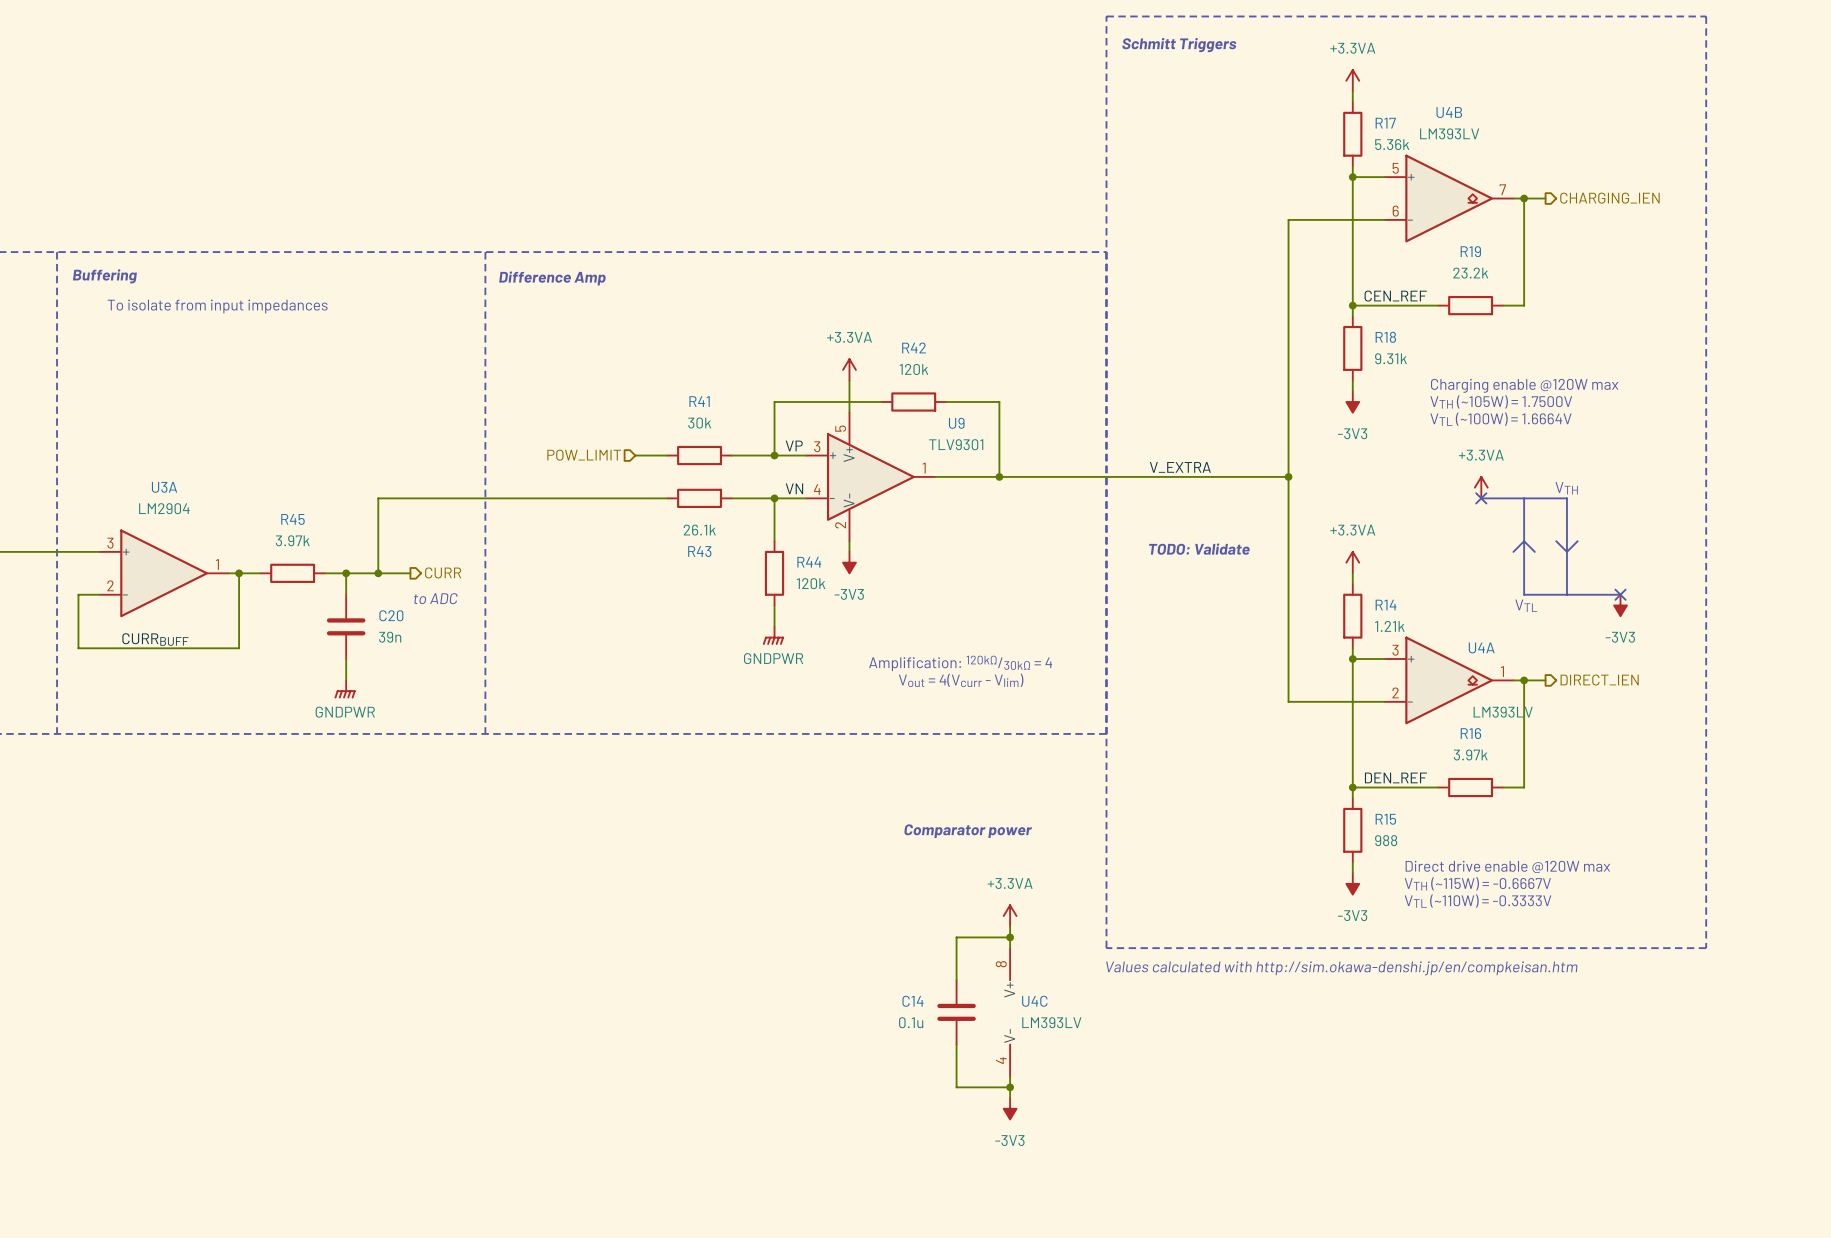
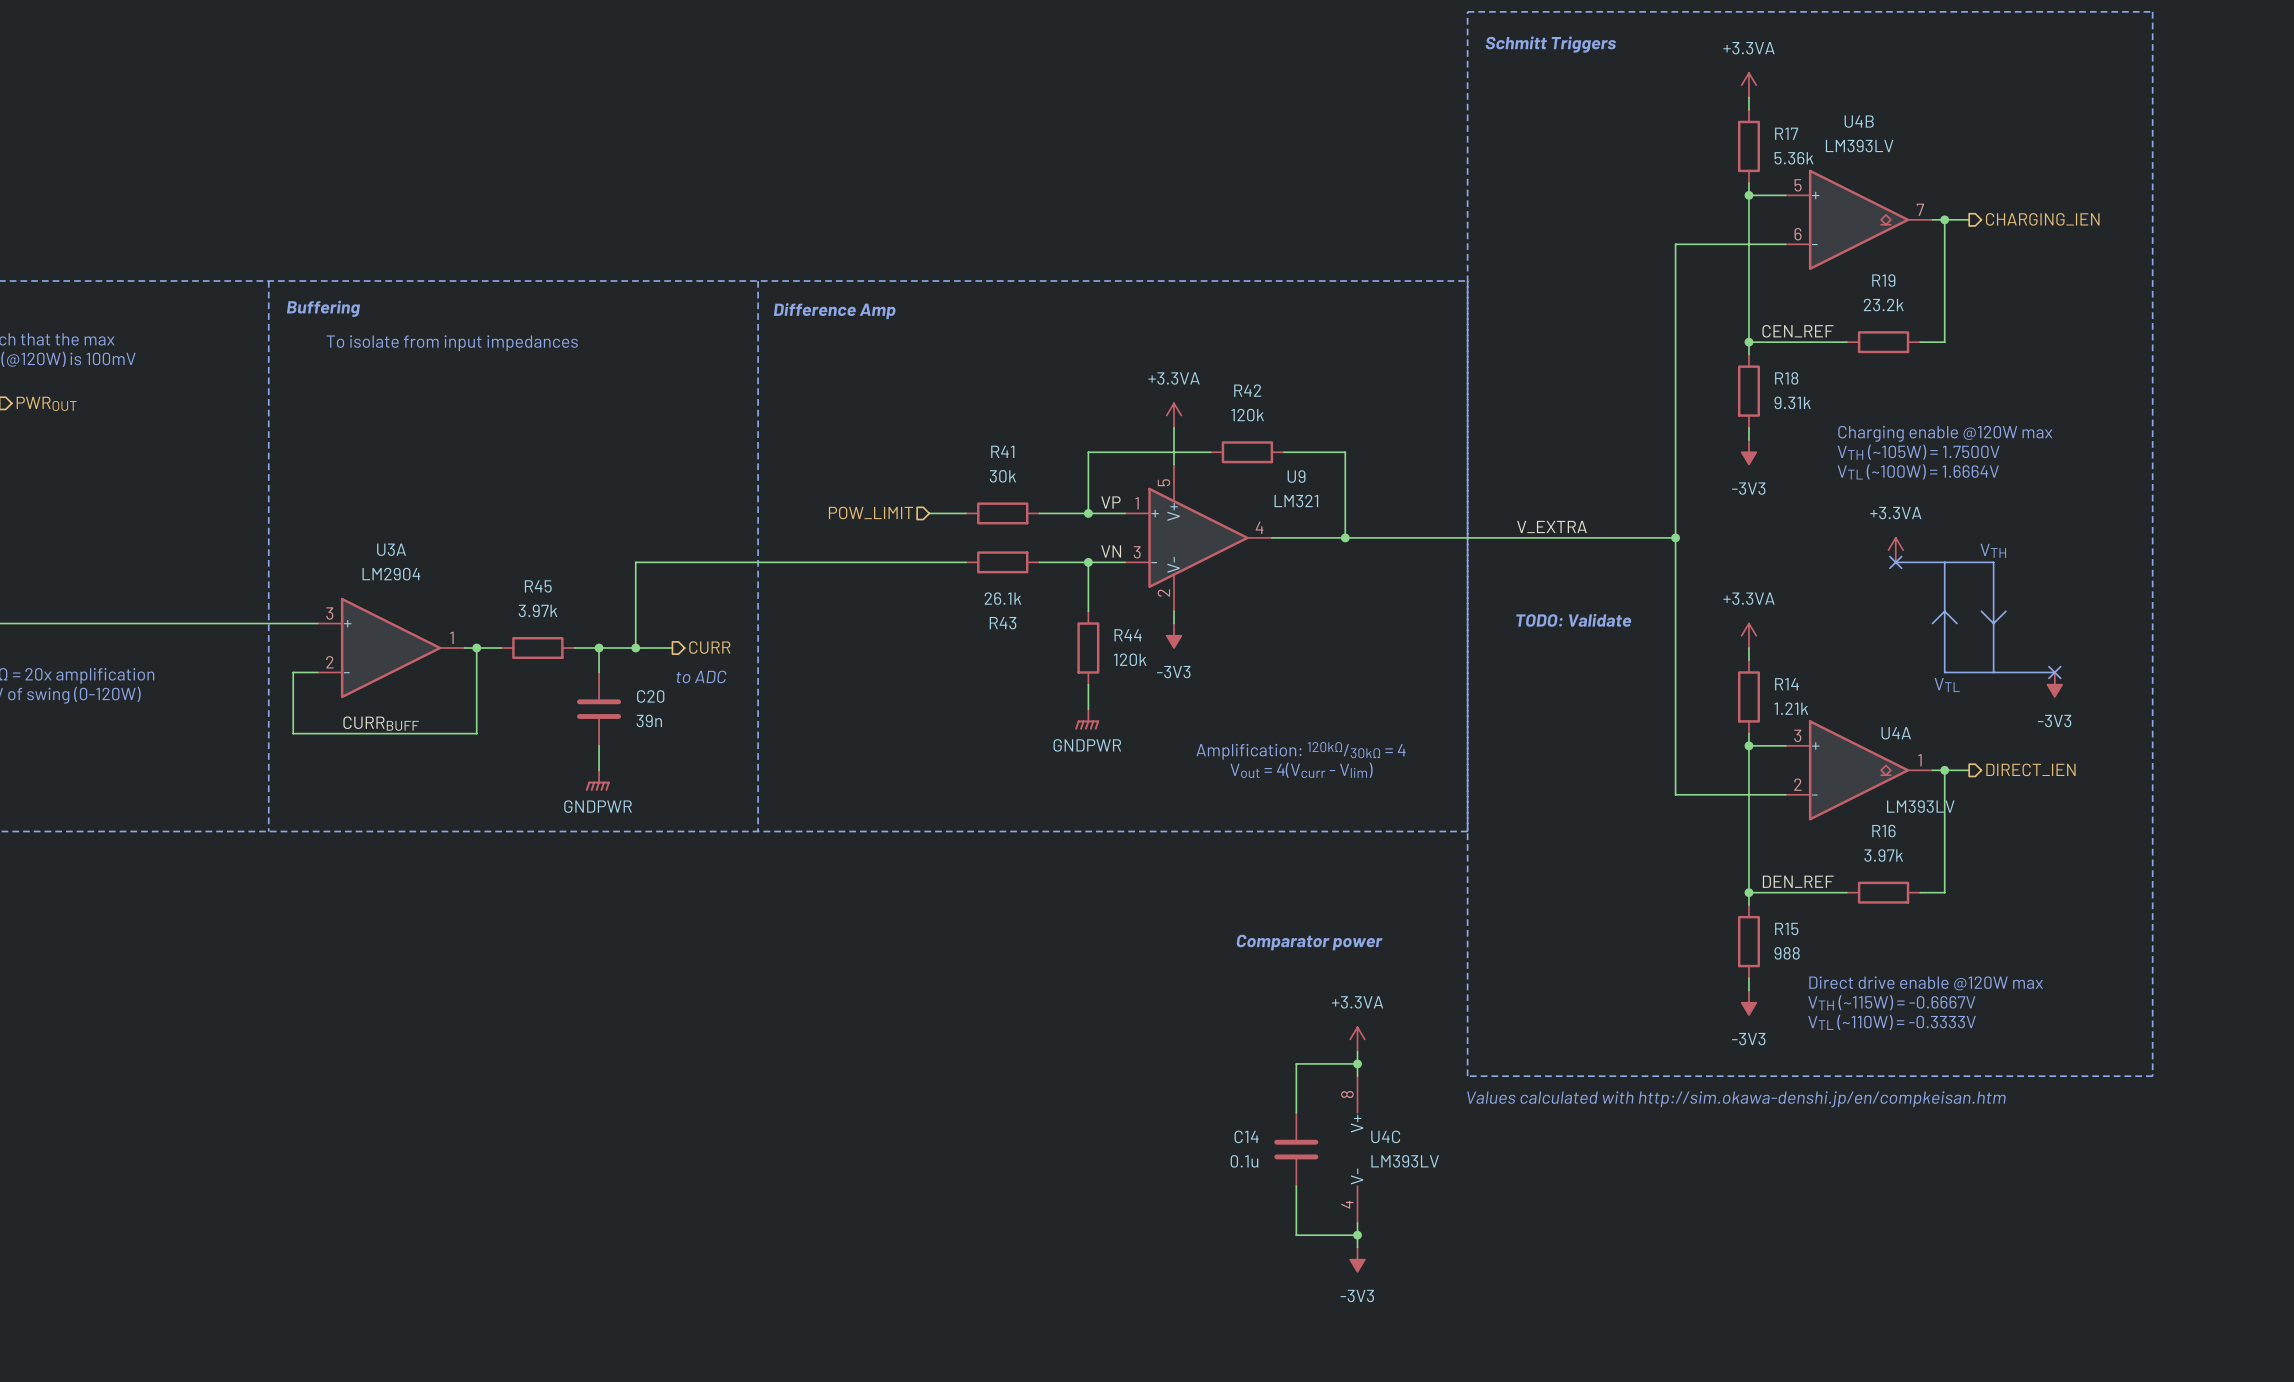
U9 value: TLV9301 (956, 444) -> LM321 (1296, 501)
U9 pin number: 3 (817, 446) -> 1 (1137, 503)
U9 pin number: 1 (924, 468) -> 4 (1259, 527)
U9 pin number: 4 (817, 489) -> 3 (1137, 552)

